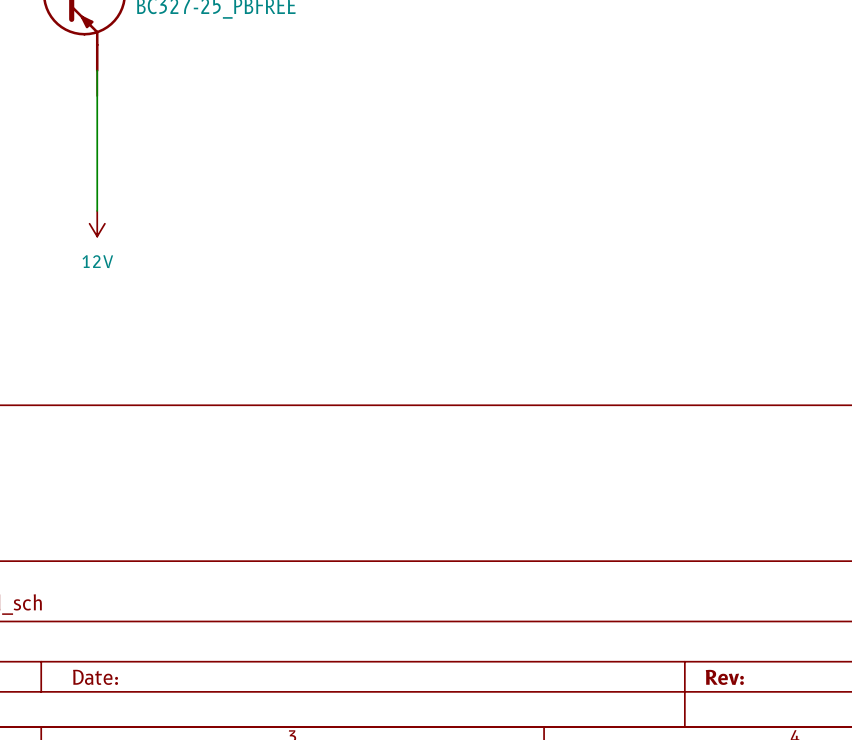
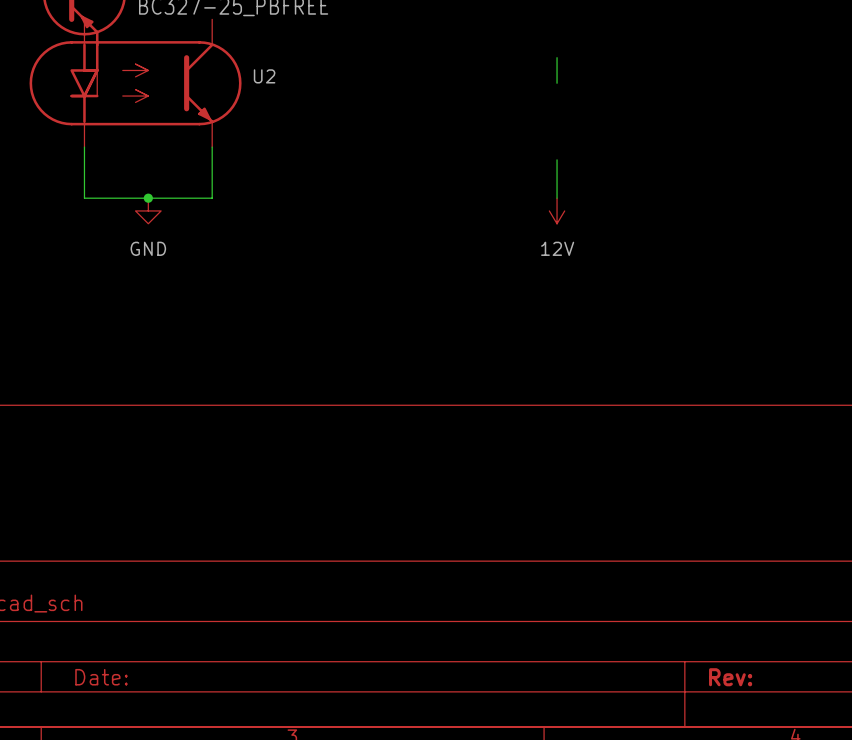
wire: none -> (557, 57) (557, 83)
wire: (97, 70) (97, 210) -> none
U2: none -> (135, 83)
wire: none -> (84, 147) (84, 198) (212, 198) (212, 147)
wire: none -> (557, 159) (557, 198)
junction: none -> (148, 198)
power symbol: none -> GND (148, 210)
power symbol: none -> 12V (557, 210)
power symbol: 12V (97, 223) -> none

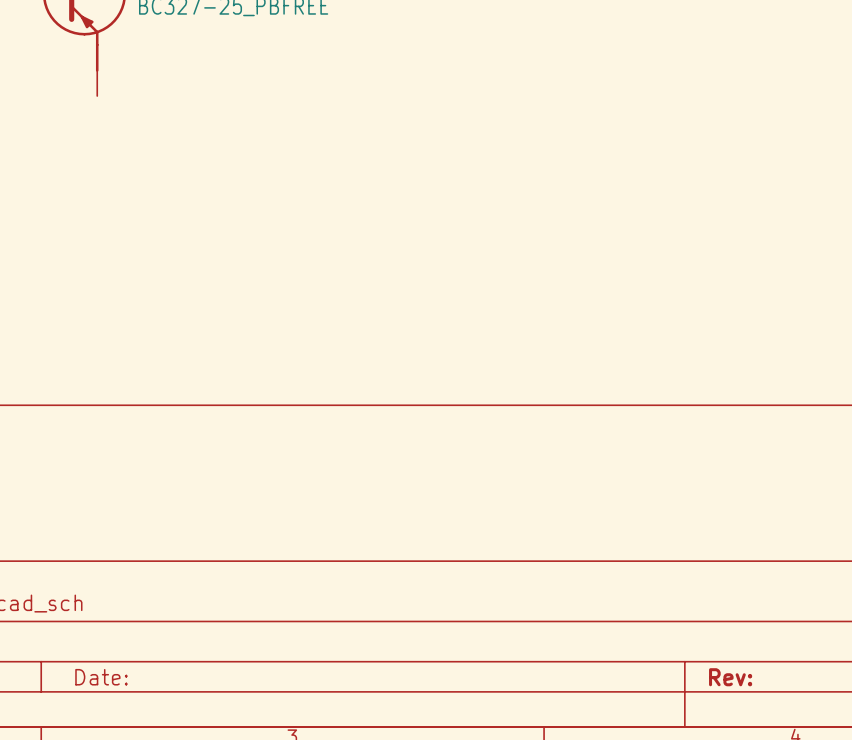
wire: (557, 57) (557, 83) -> none
U2: (135, 83) -> none
wire: (84, 147) (84, 198) (212, 198) (212, 147) -> none
wire: (557, 159) (557, 198) -> none
junction: (148, 198) -> none
power symbol: GND (148, 210) -> none
power symbol: 12V (557, 210) -> none

